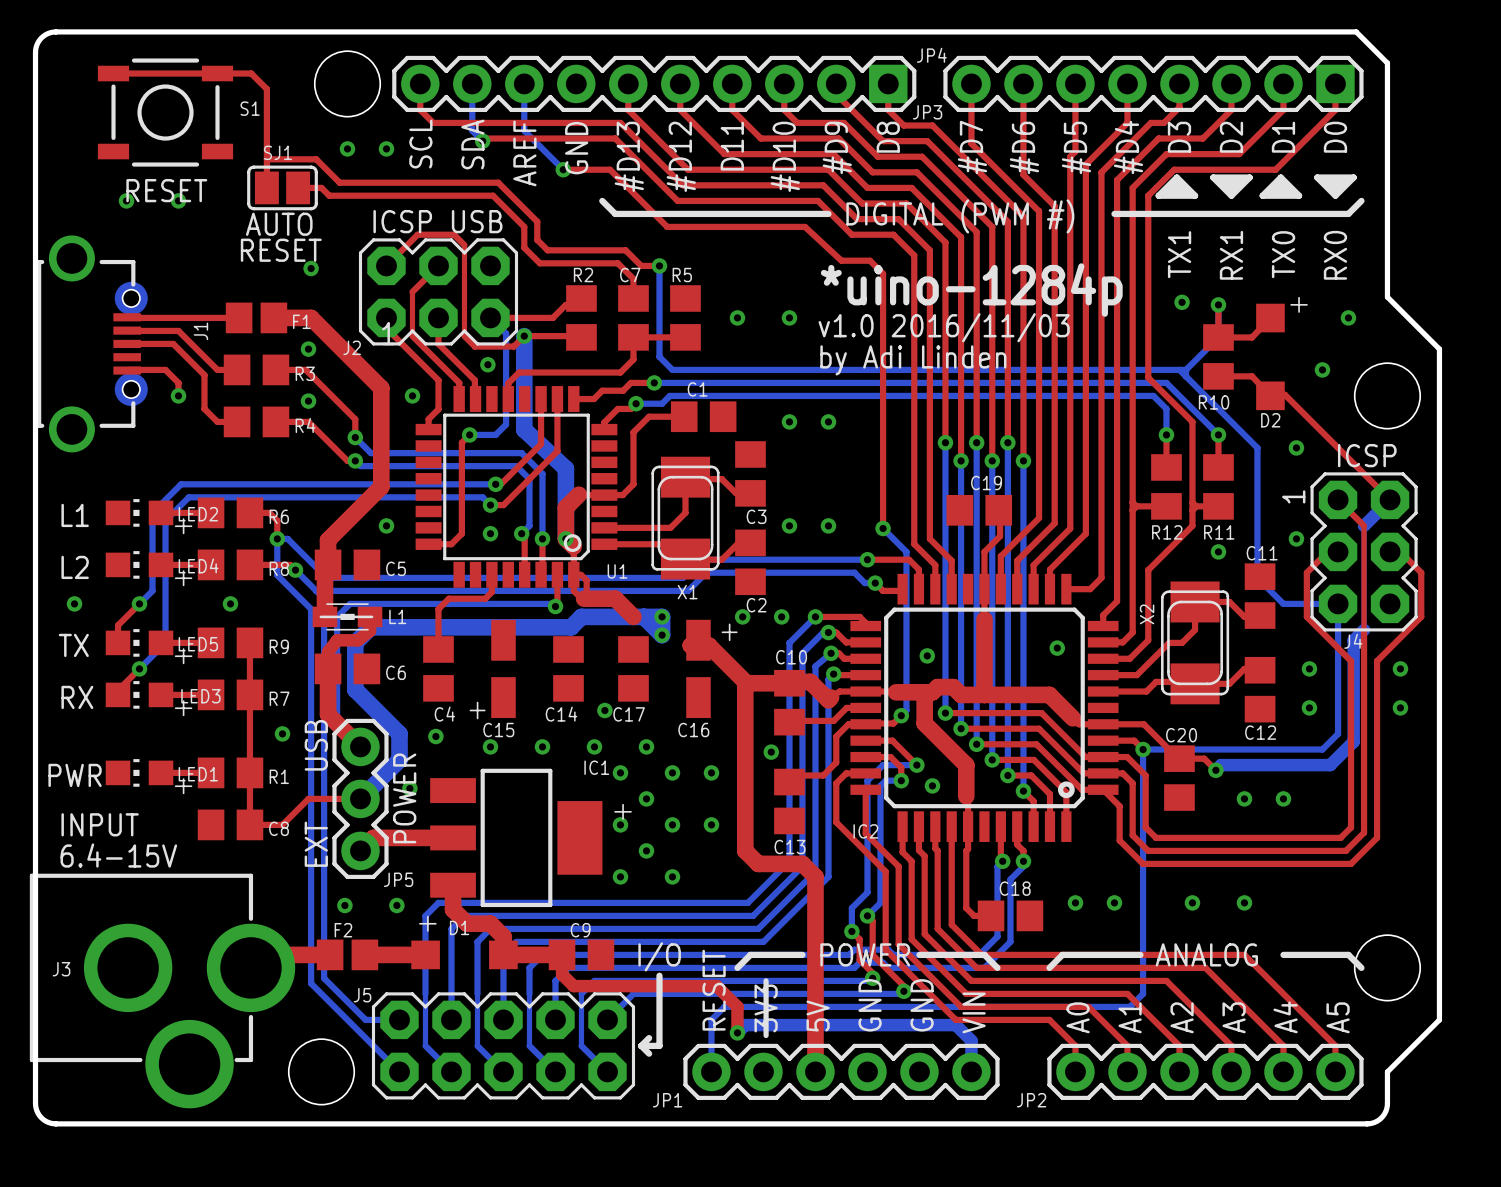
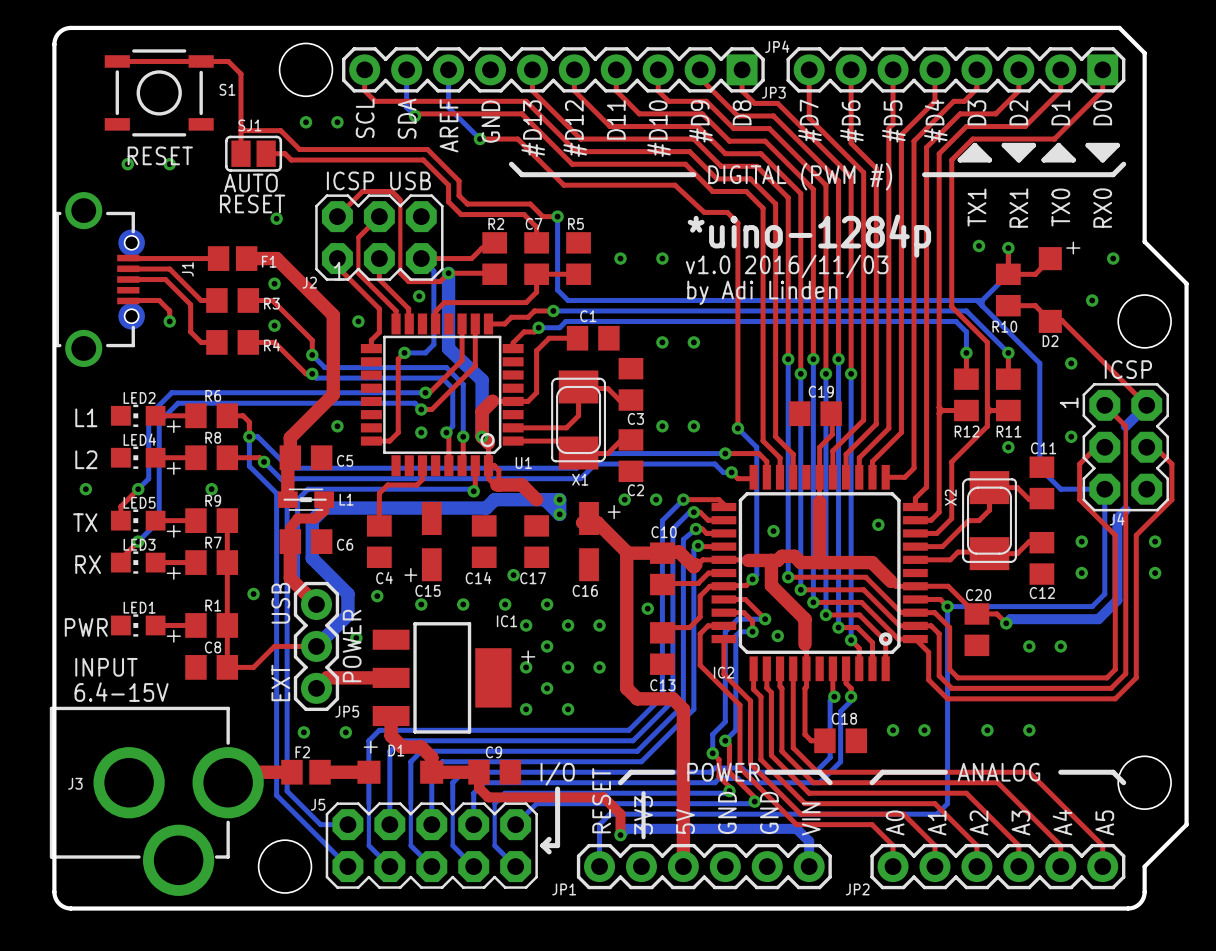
LED2 name position: LED2 (198, 514) -> LED2 (139, 397)
R6 name position: R6 (279, 516) -> R6 (213, 395)
LED4 name position: LED4 (198, 565) -> LED4 (139, 439)
R8 name position: R8 (279, 568) -> R8 (213, 437)
LED5 name position: LED5 (198, 644) -> LED5 (139, 502)
R9 name position: R9 (279, 646) -> R9 (213, 500)
LED3 name position: LED3 (200, 696) -> LED3 (139, 544)
R7 name position: R7 (279, 698) -> R7 (213, 542)
LED1 name position: LED1 (198, 774) -> LED1 (139, 607)
R1 name position: R1 (279, 776) -> R1 (213, 605)
C8 name position: C8 (279, 828) -> C8 (213, 647)

